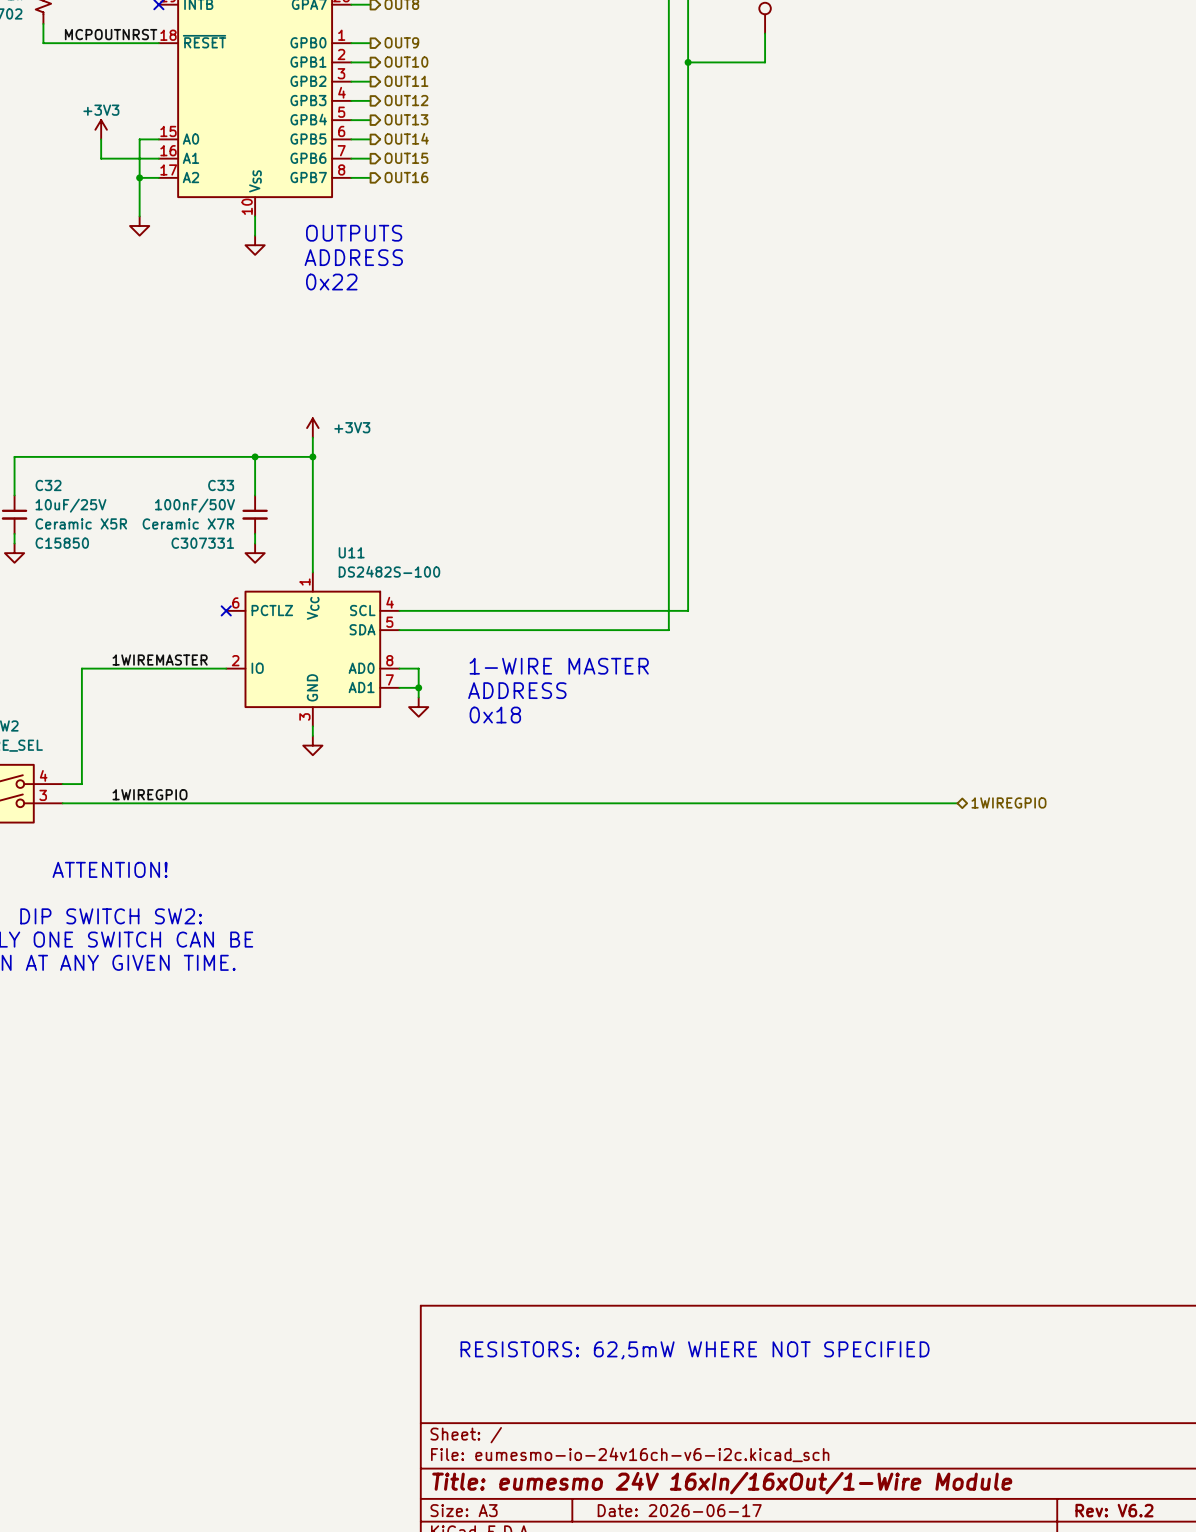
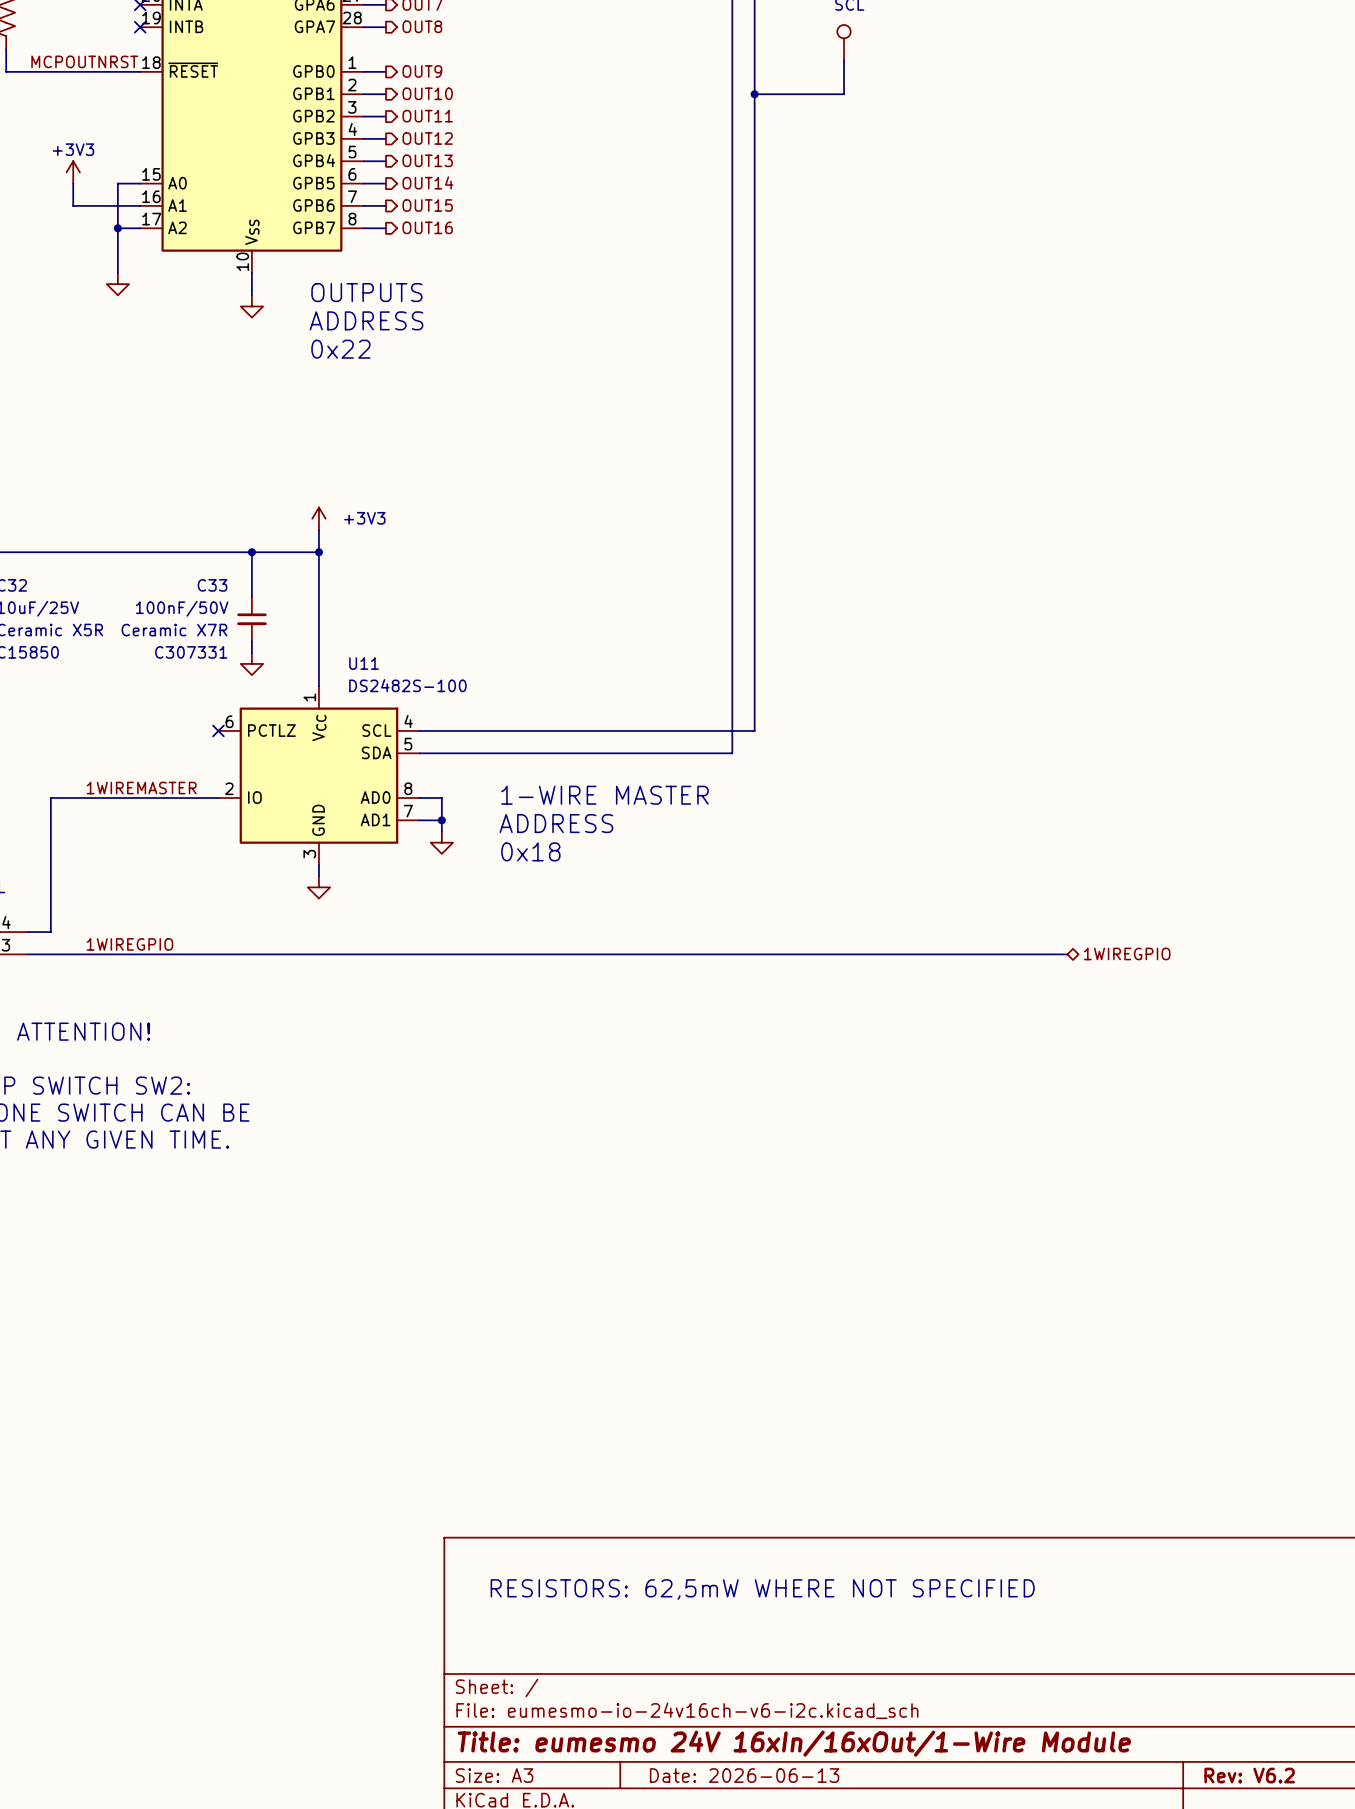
title block: Date: 2026-06-17 (679, 1510) -> Date: 2026-06-13 (744, 1775)

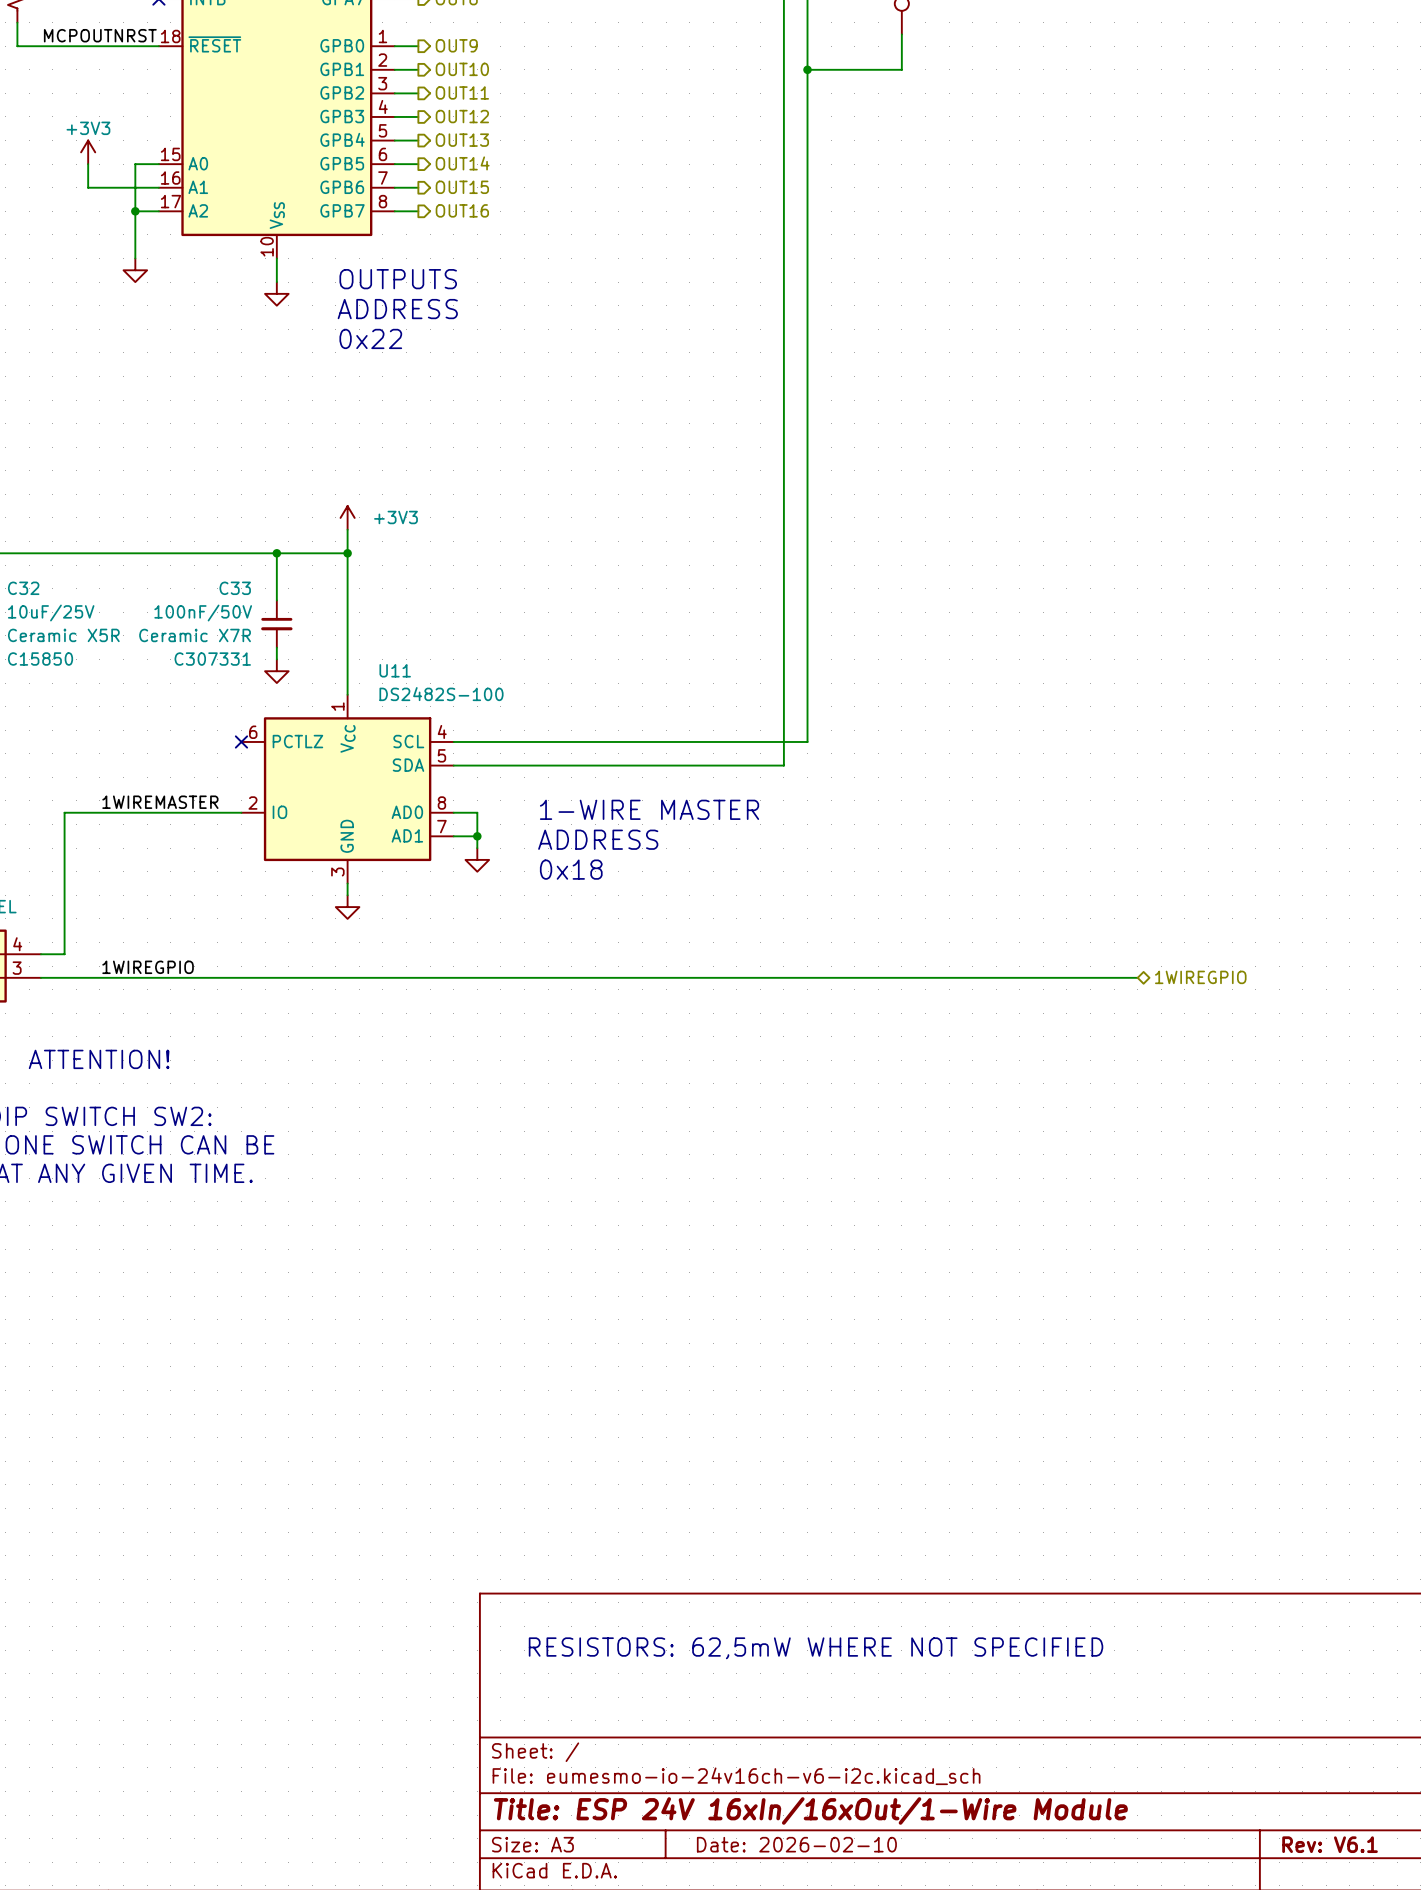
title block: Title: eumesmo 24V 16xIn/16xOut/1-Wire Module (794, 1743) -> Title: ESP 24V 16xIn/16xOut/1-Wire Module (810, 1810)
title block: Date: 2026-06-13 (744, 1775) -> Date: 2026-02-10 (796, 1844)
title block: Rev: V6.2 (1249, 1775) -> Rev: V6.1 (1330, 1844)

